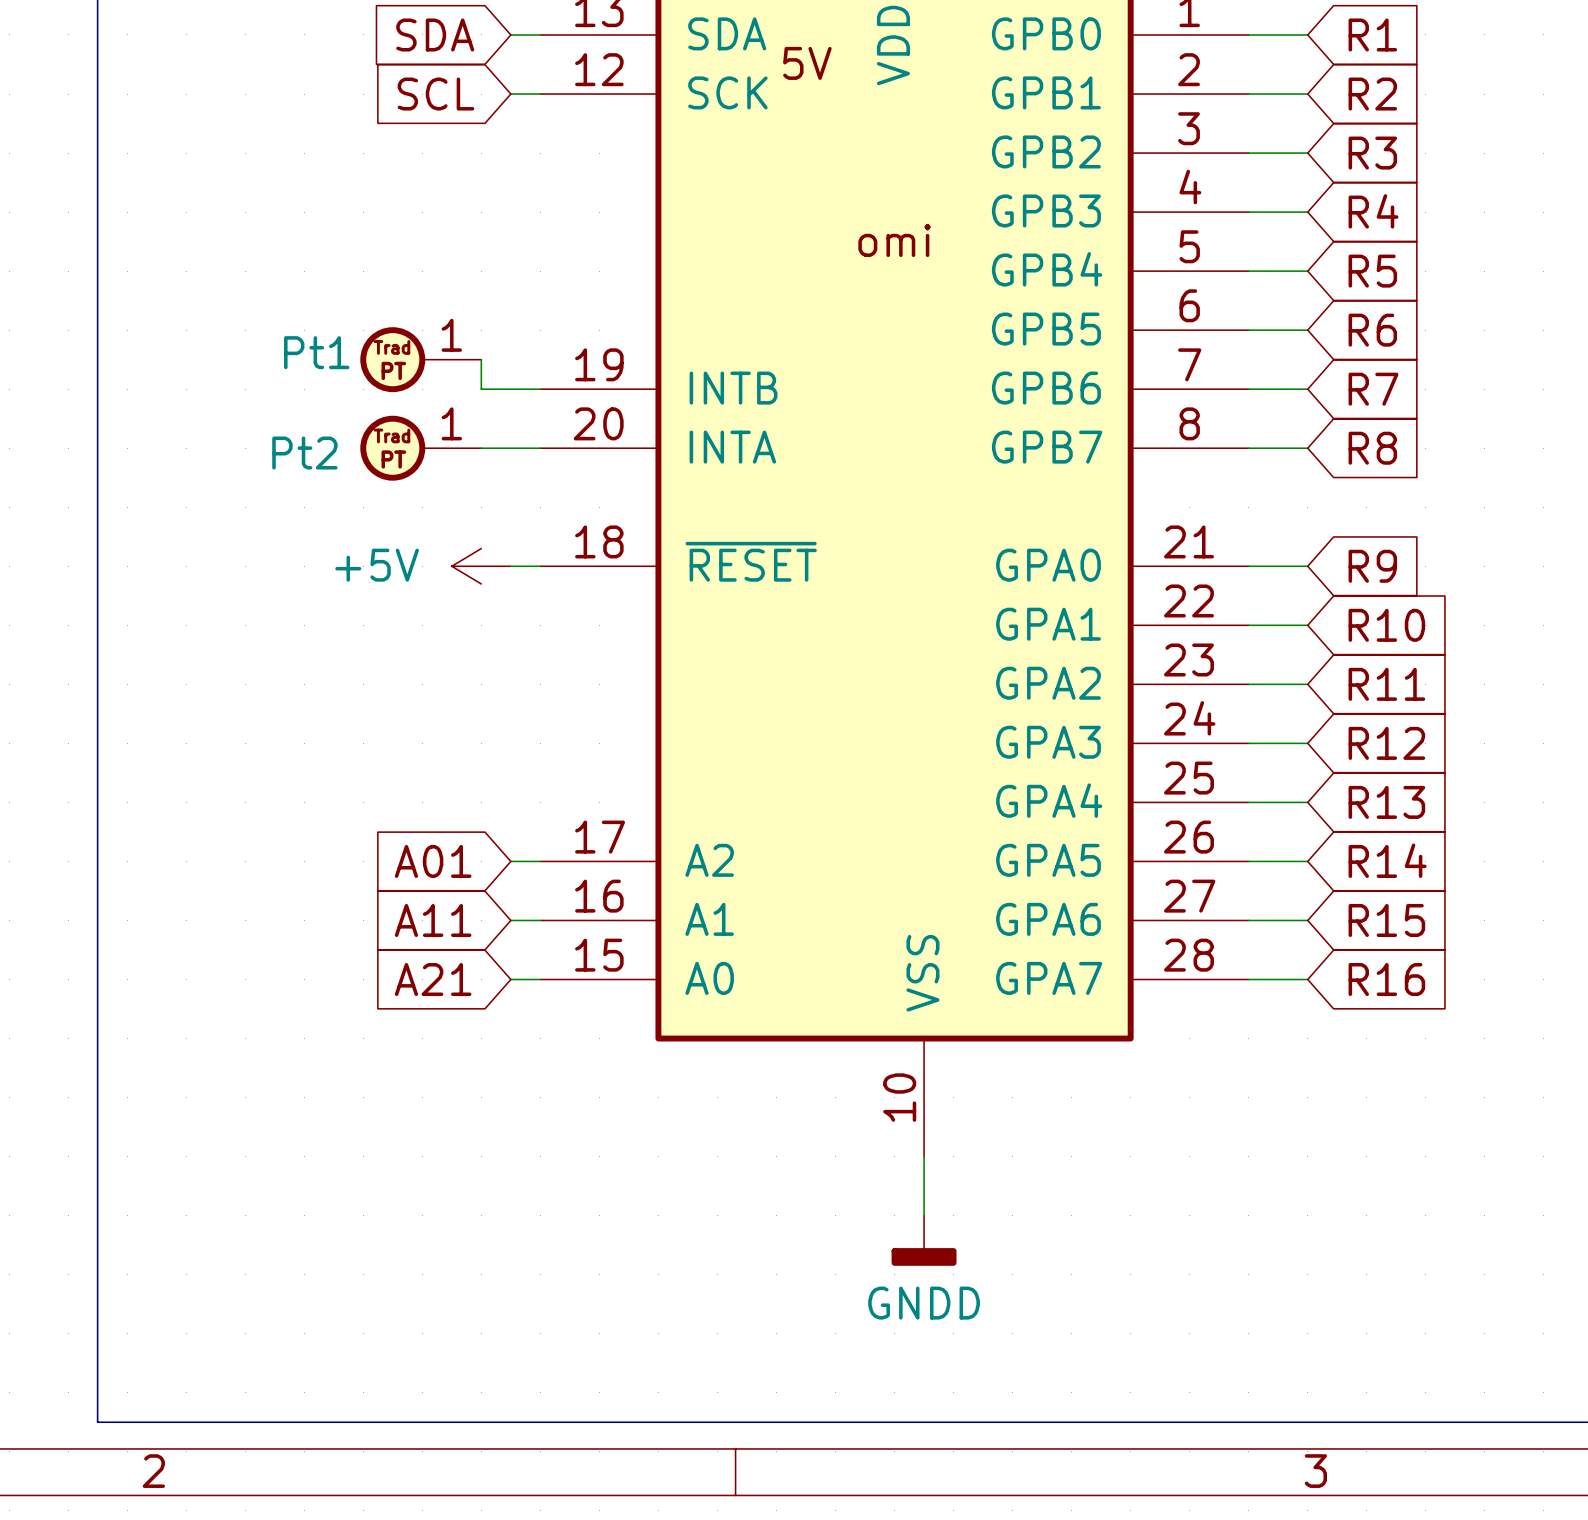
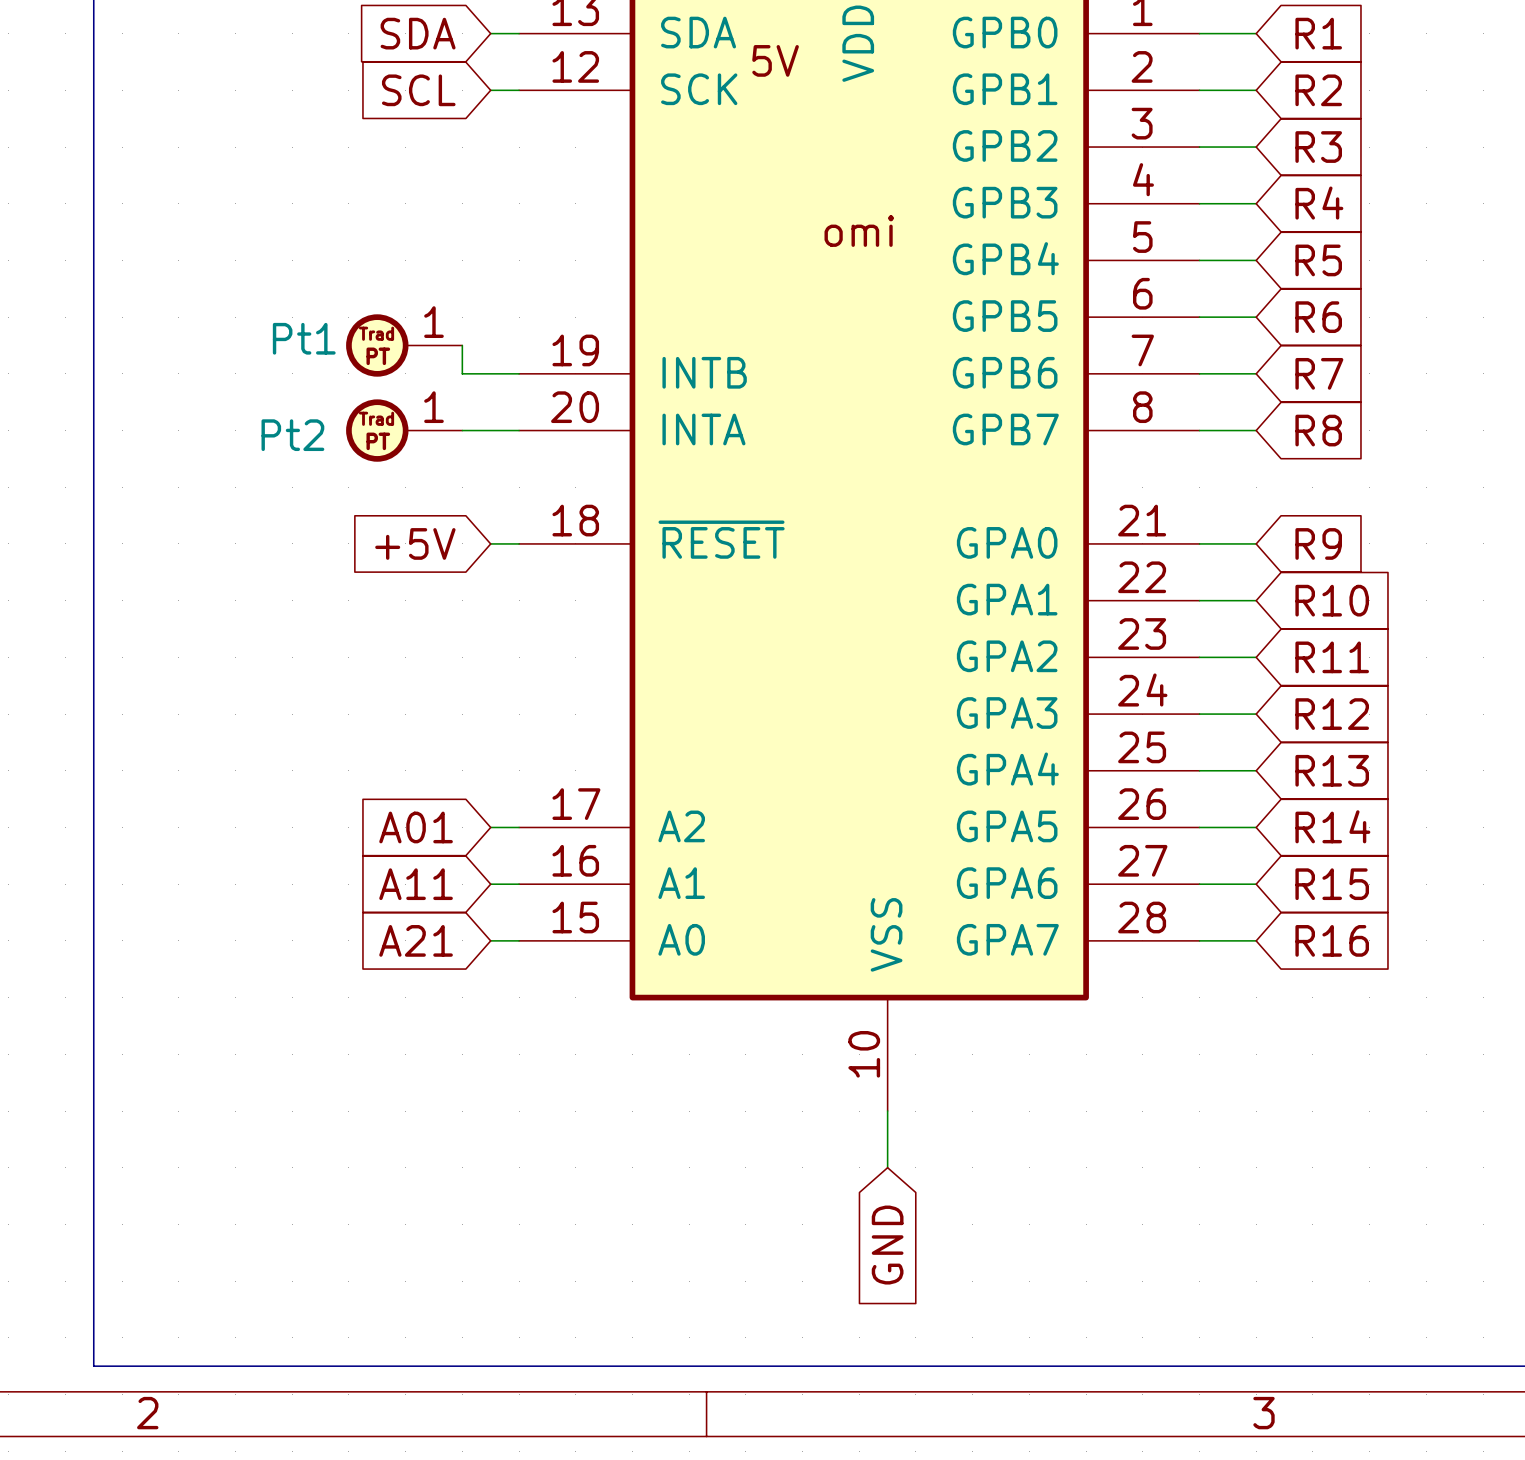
global label: none -> +5V (415, 543)
power symbol: +5V (481, 566) -> none
power symbol: GNDD (924, 1240) -> none
global label: none -> GND (887, 1245)

